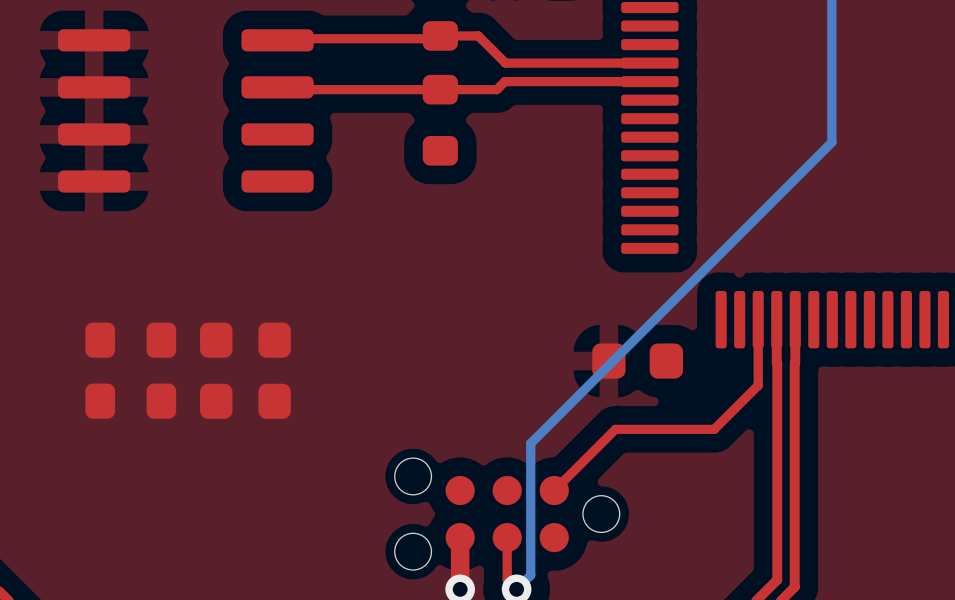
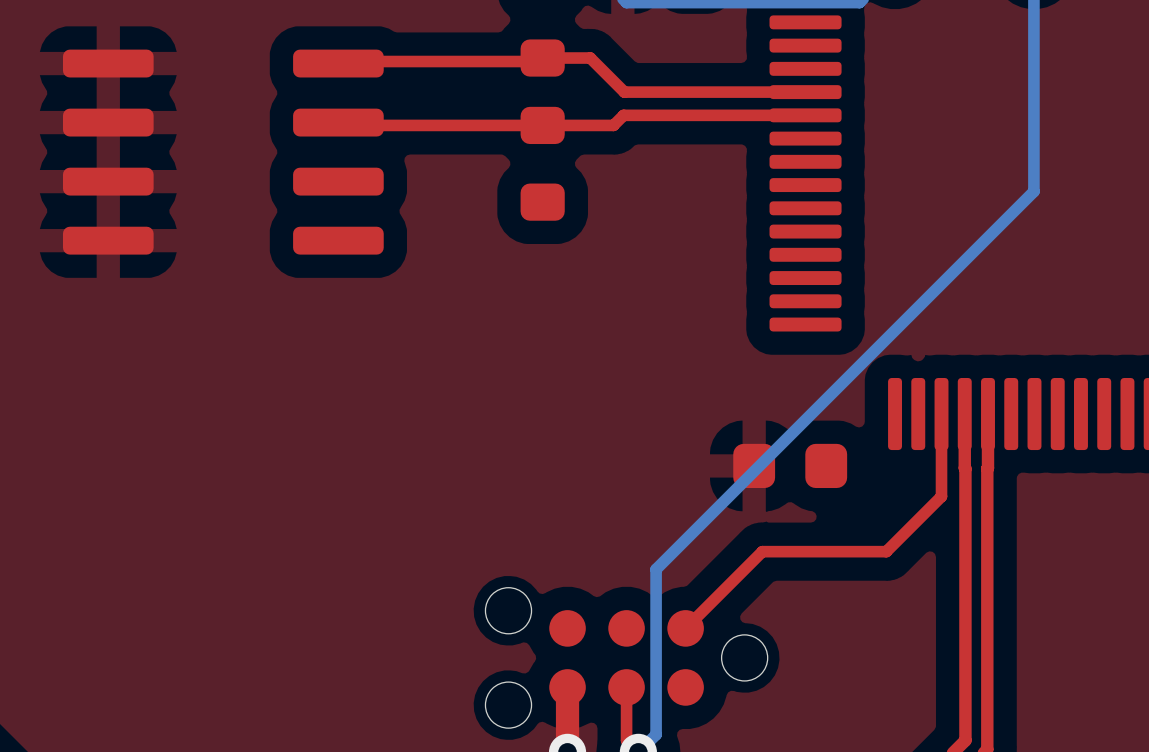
part: (130, 340) -> none
part: (245, 340) -> none
part: (130, 401) -> none
part: (245, 401) -> none

